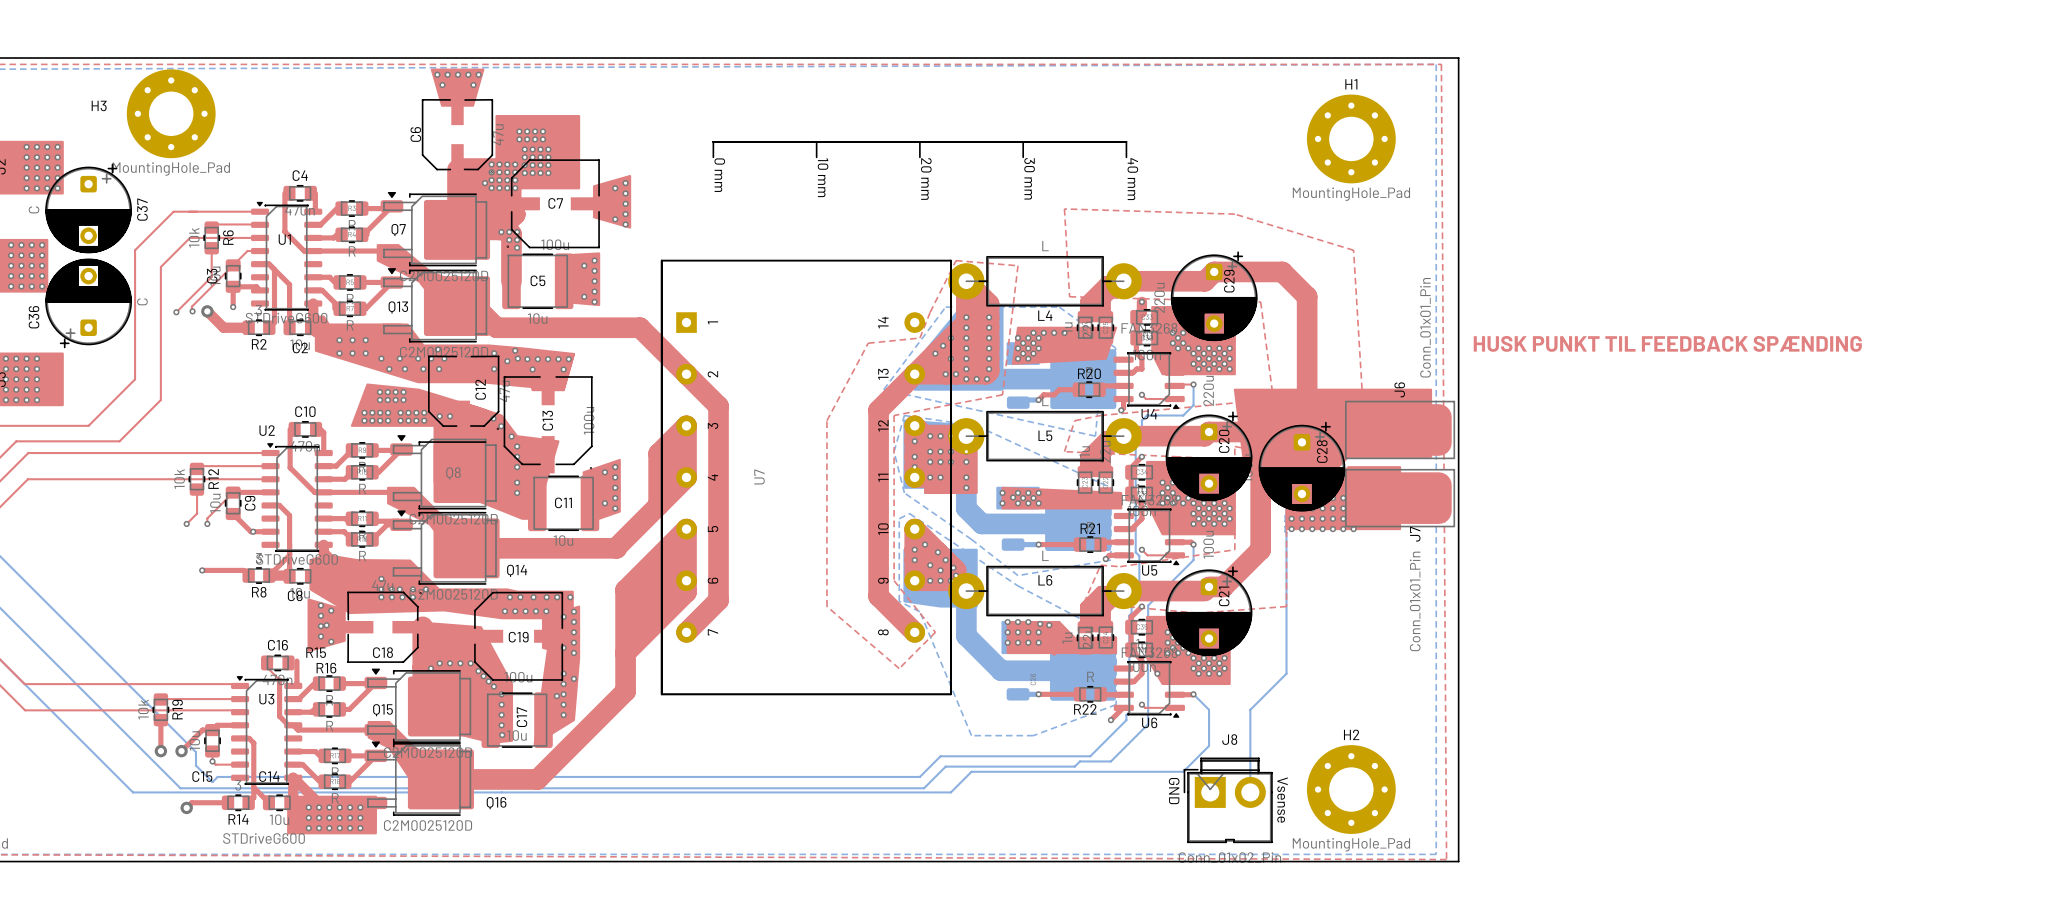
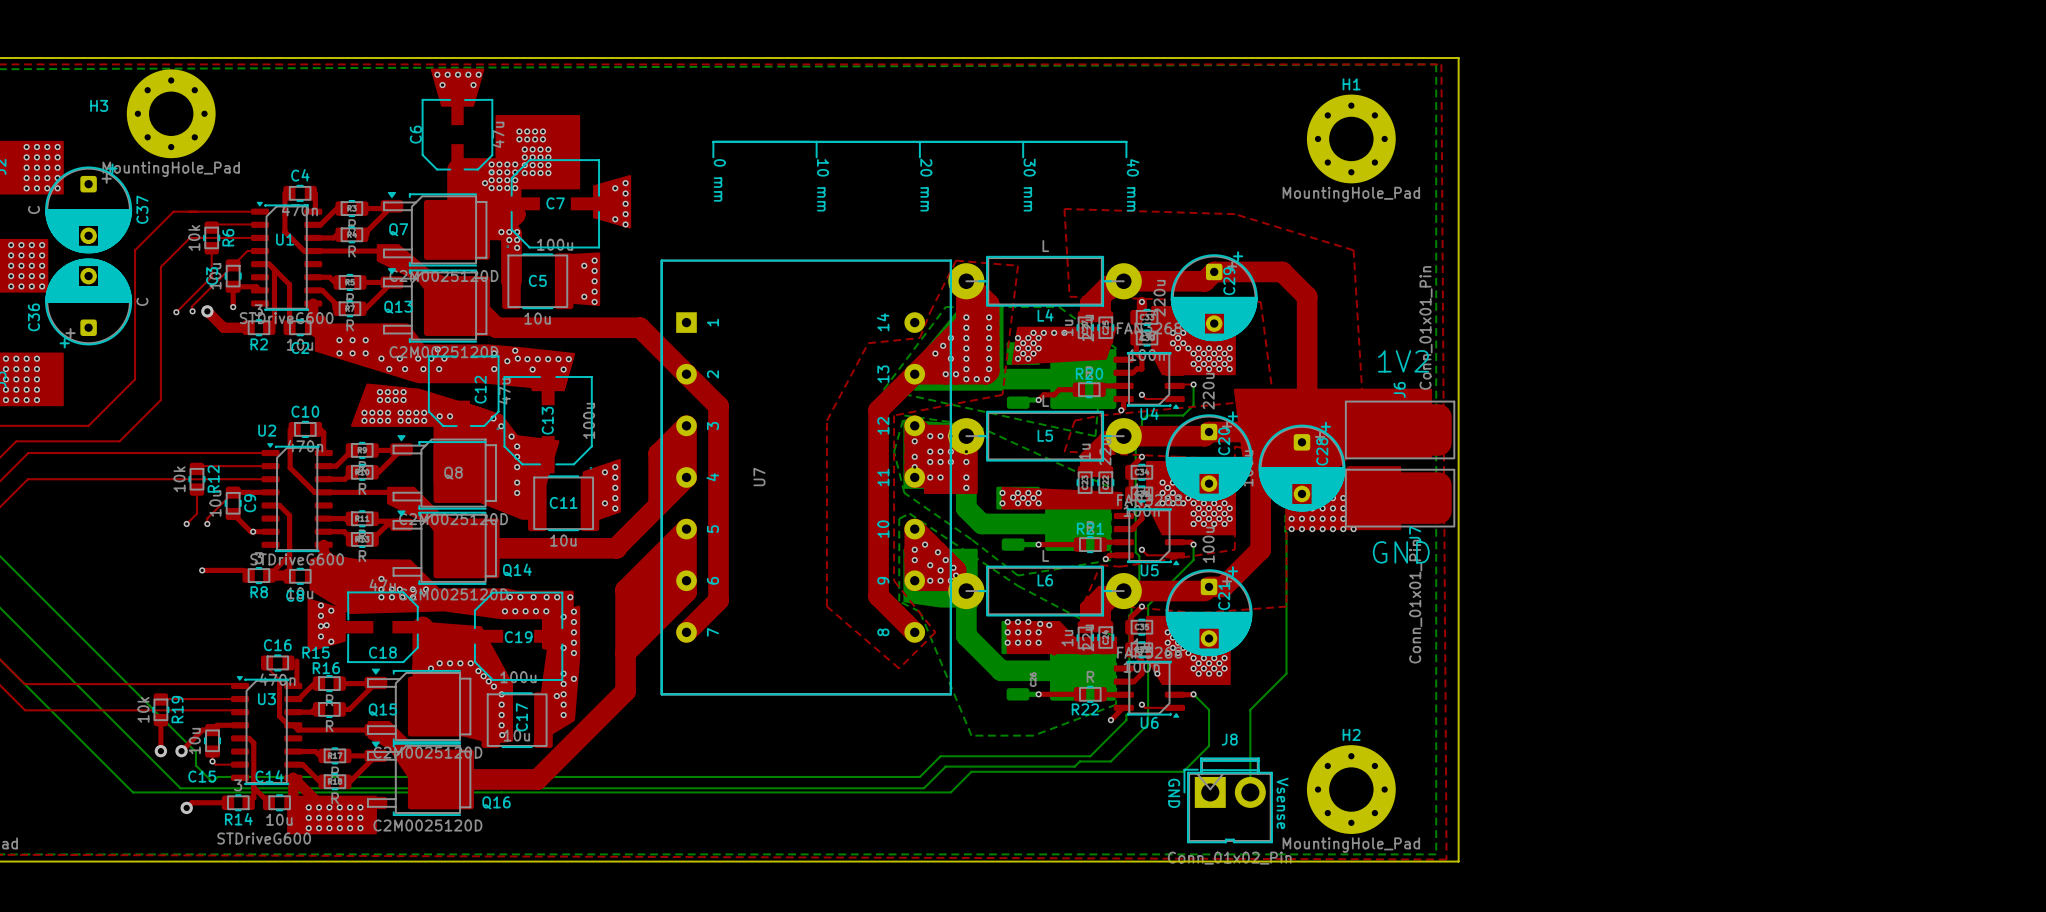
text: HUSK PUNKT TIL FEEDBACK SPÆNDING (1667, 343) -> none
text: none -> 1V2 (1403, 361)
text: none -> GND (1401, 552)

